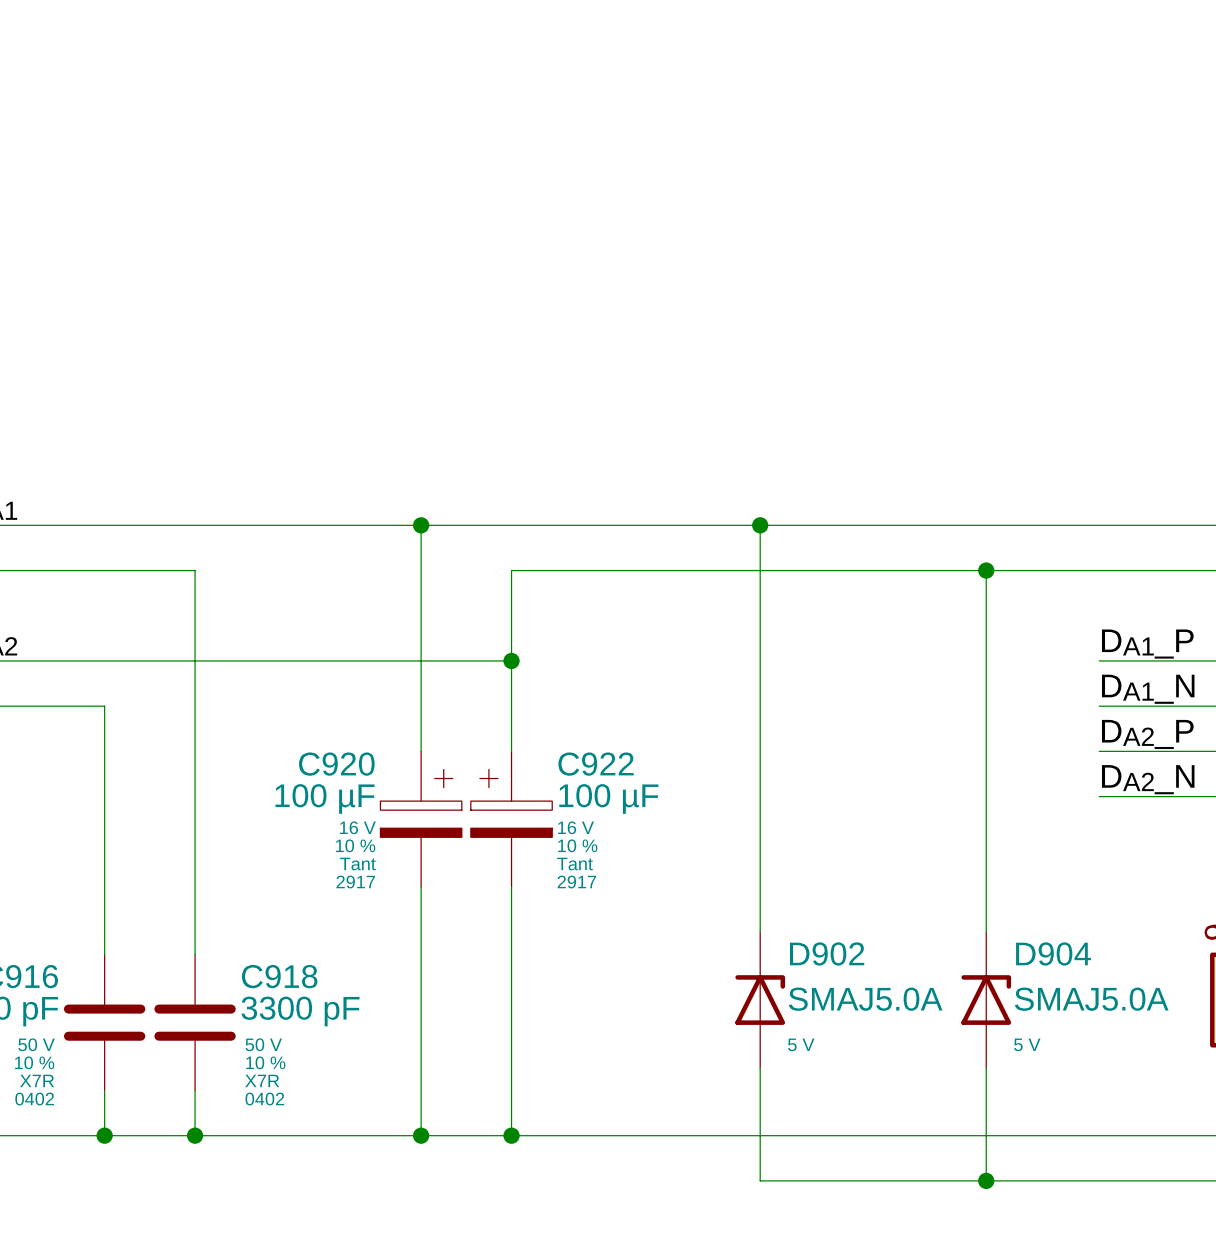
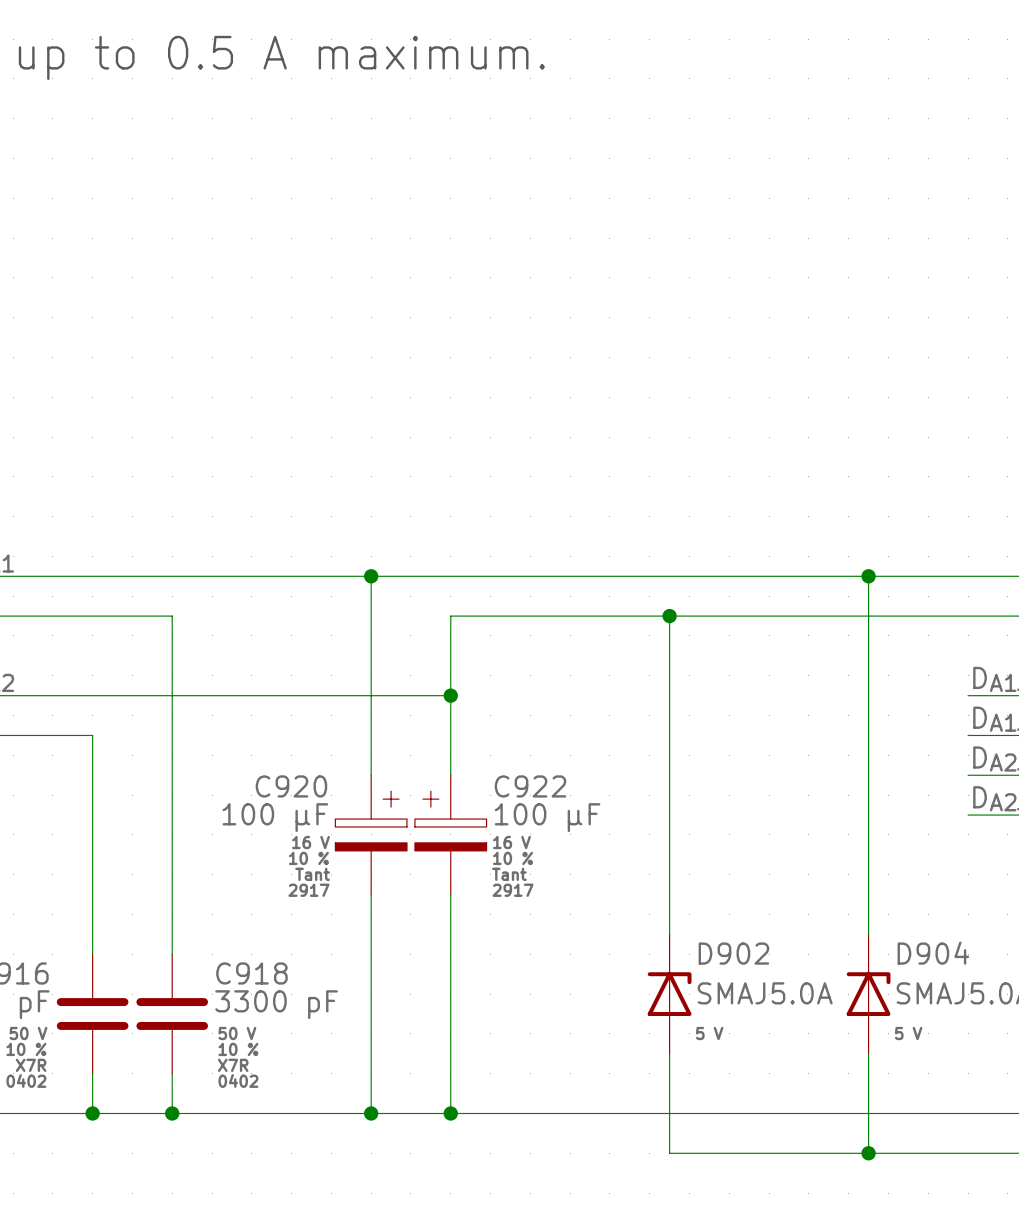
wire: (760, 525) (760, 570) -> (868, 576) (868, 616)
junction position: (760, 525) -> (669, 616)
junction position: (986, 570) -> (868, 576)

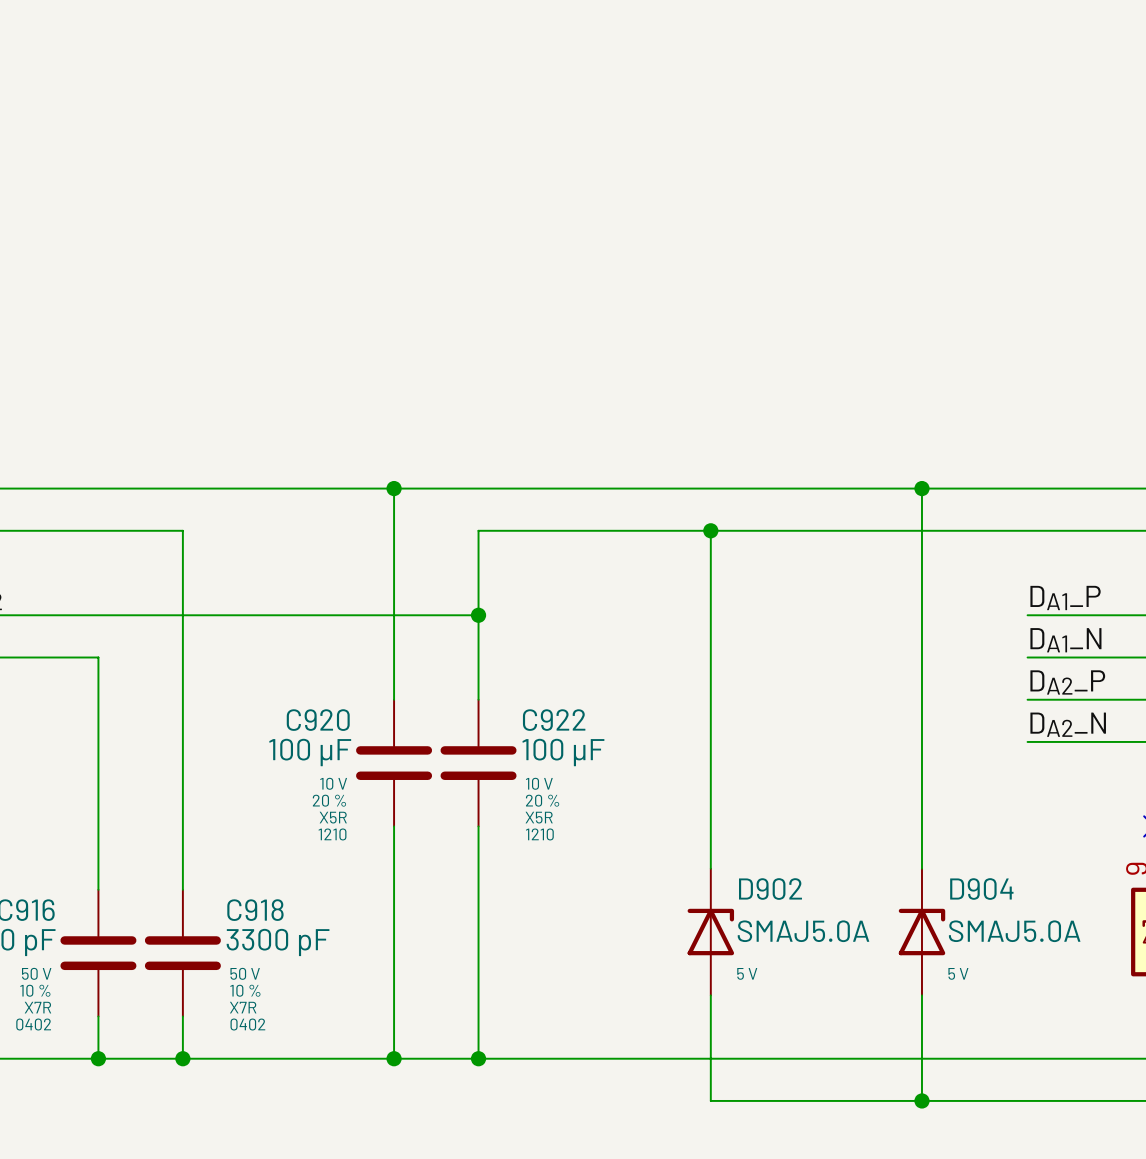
C920 symbol: [335, 775, 407, 895] -> [356, 699, 433, 827]
C922 symbol: [414, 775, 487, 895] -> [440, 699, 517, 827]
C920 text: 16 V (311, 842) -> 10 V (333, 783)
C922 text: 16 V (511, 842) -> 10 V (539, 783)
C920 text: 10 % (308, 858) -> 20 % (329, 800)
C922 text: 10 % (513, 858) -> 20 % (542, 800)
C920 text: Tant (312, 874) -> X5R (333, 817)
C922 text: Tant (509, 874) -> X5R (539, 817)
C920 text: 2917 (308, 890) -> 1210 (332, 834)
C922 text: 2917 (513, 890) -> 1210 (539, 834)

